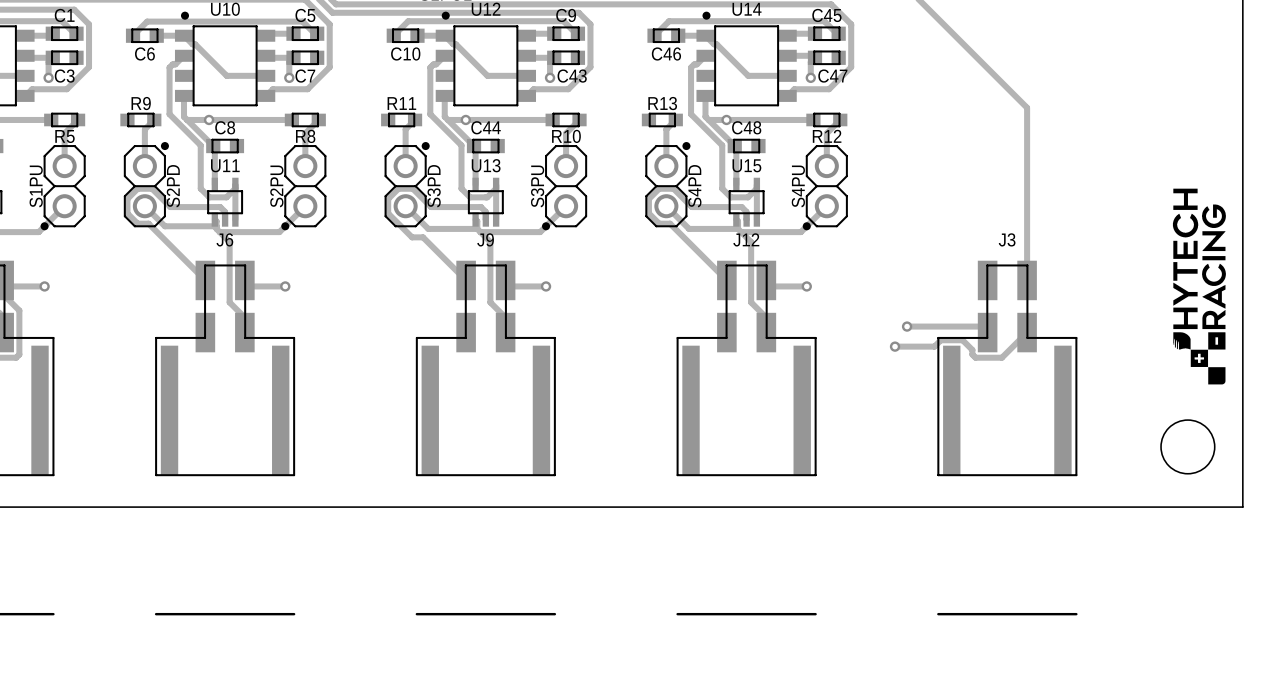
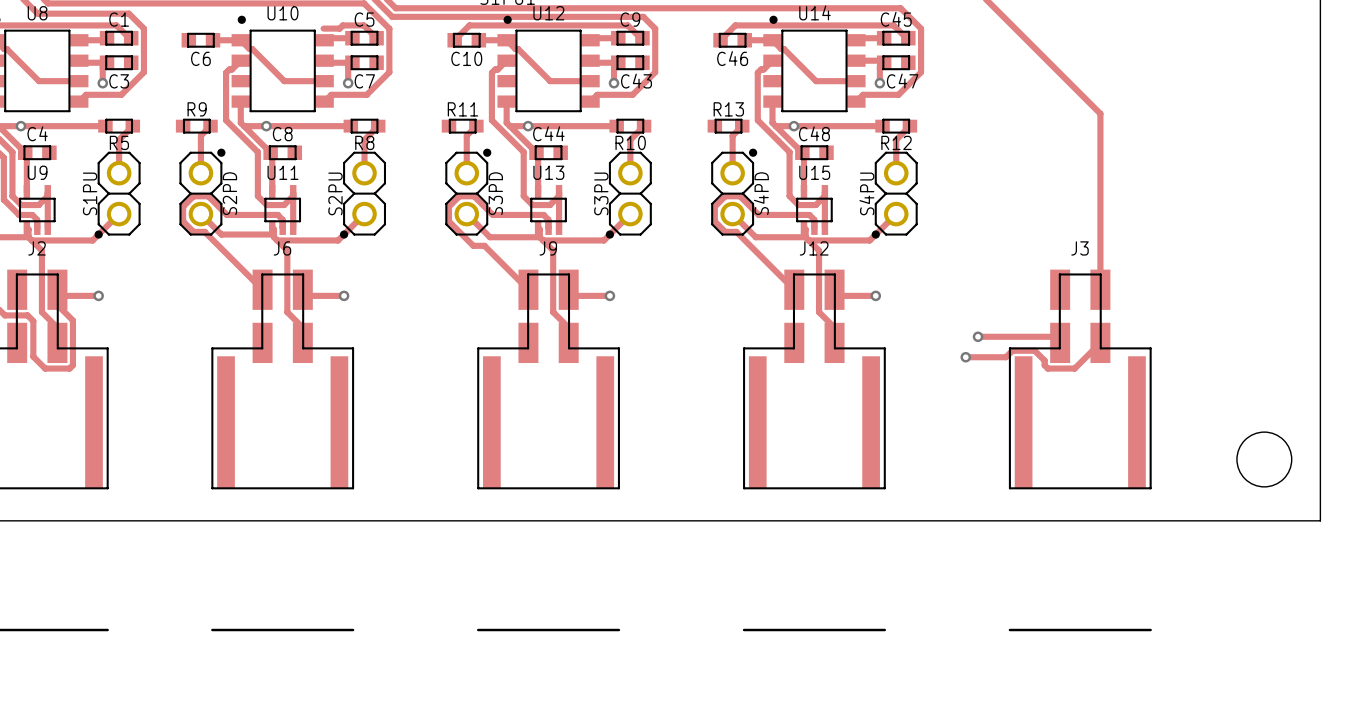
track: (317, 33) (314, 33) (302, 21) (147, 21) (133, 35) -> (376, 38) (363, 25) (342, 25) (339, 28) (323, 28)
drawing: [1172, 188, 1226, 385] -> none

